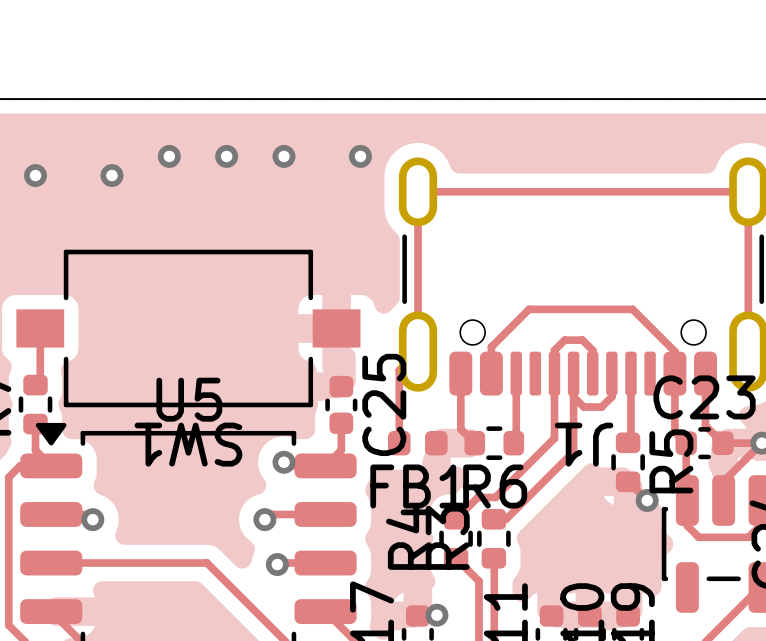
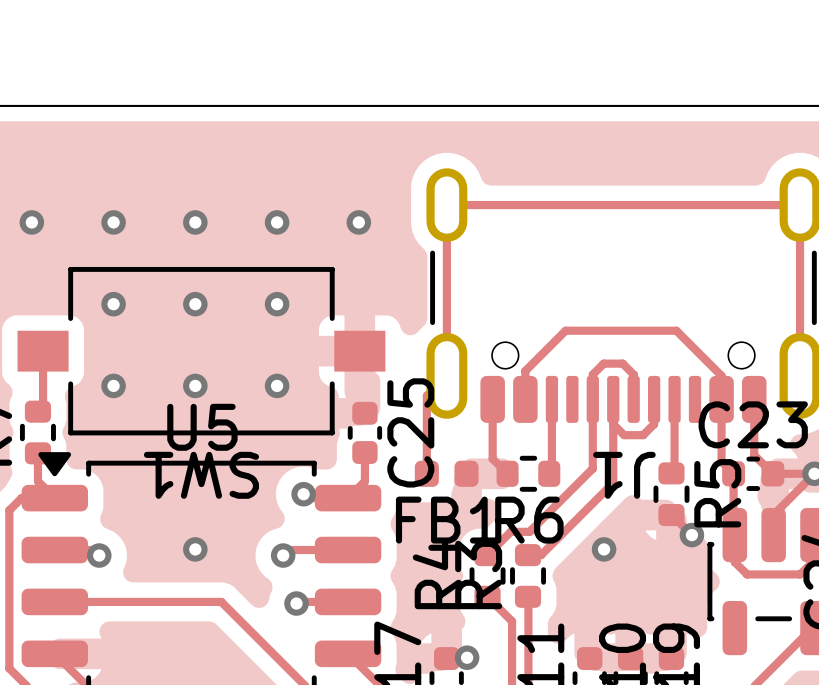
via: (169, 156) -> none
via: (226, 156) -> none
via: (284, 156) -> none
via: (360, 156) -> none
via: (35, 175) -> none
via position: (111, 175) -> (113, 222)
via: none -> (31, 222)
via: none -> (195, 222)
via: none -> (277, 222)
via: none -> (358, 222)
via: none -> (113, 304)
via: none -> (195, 304)
via: none -> (277, 304)
via: none -> (113, 385)
via: none -> (195, 385)
via: none -> (277, 385)
via: none -> (195, 549)
via: none -> (604, 549)

